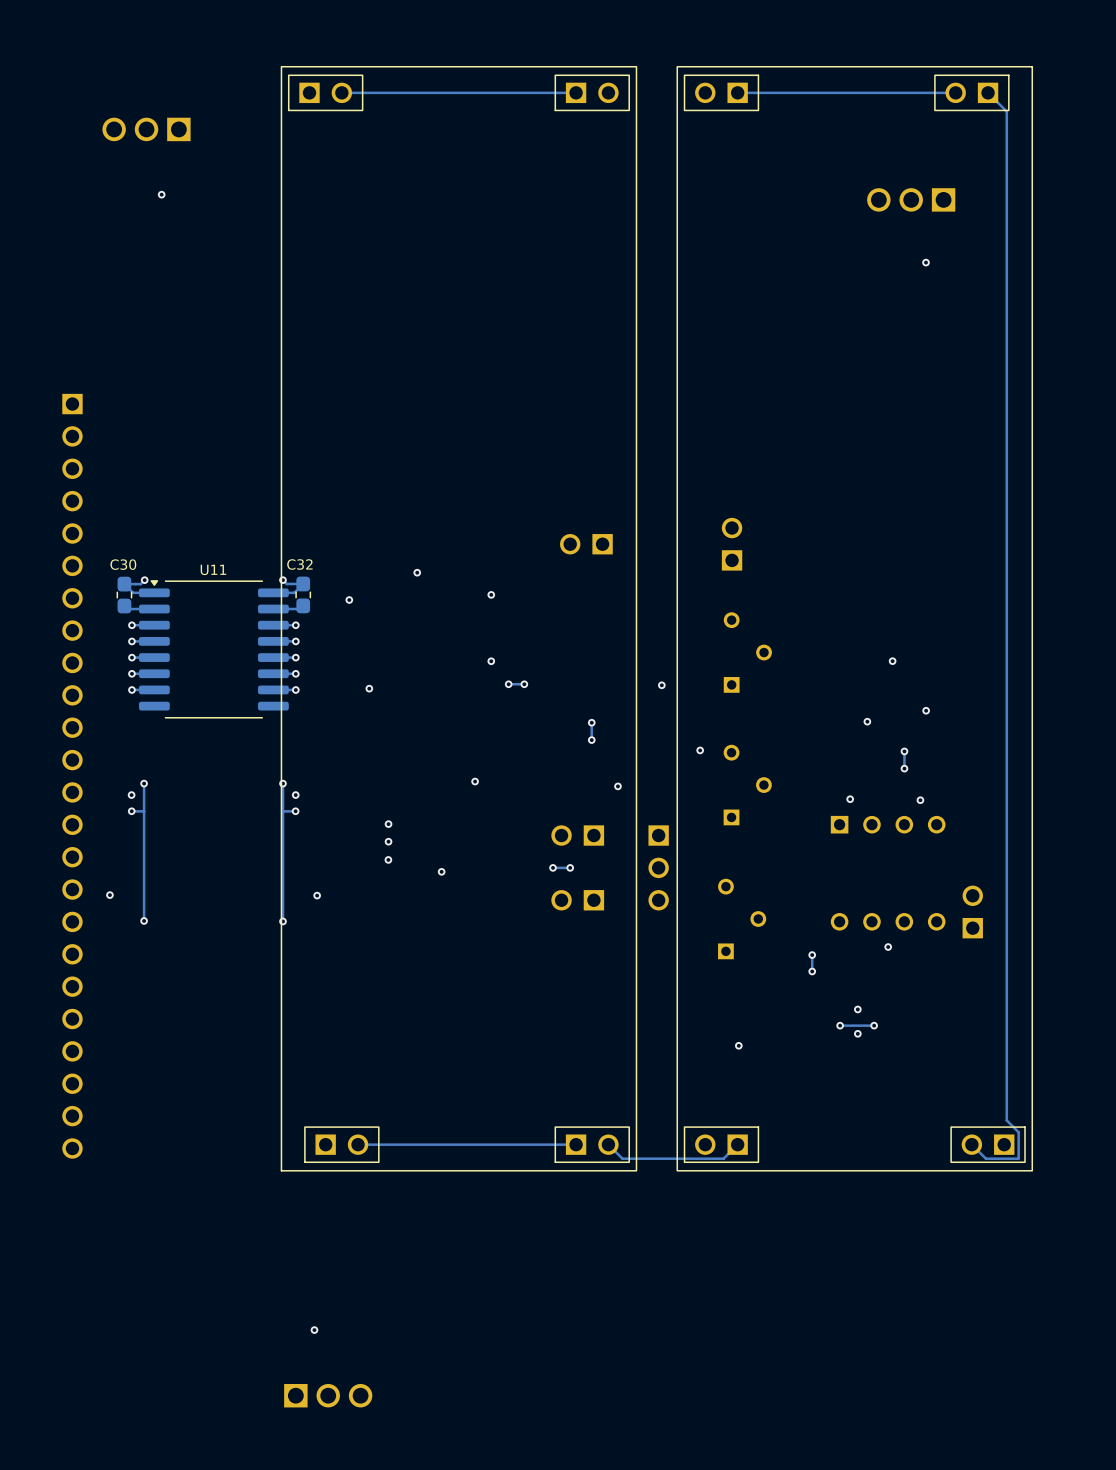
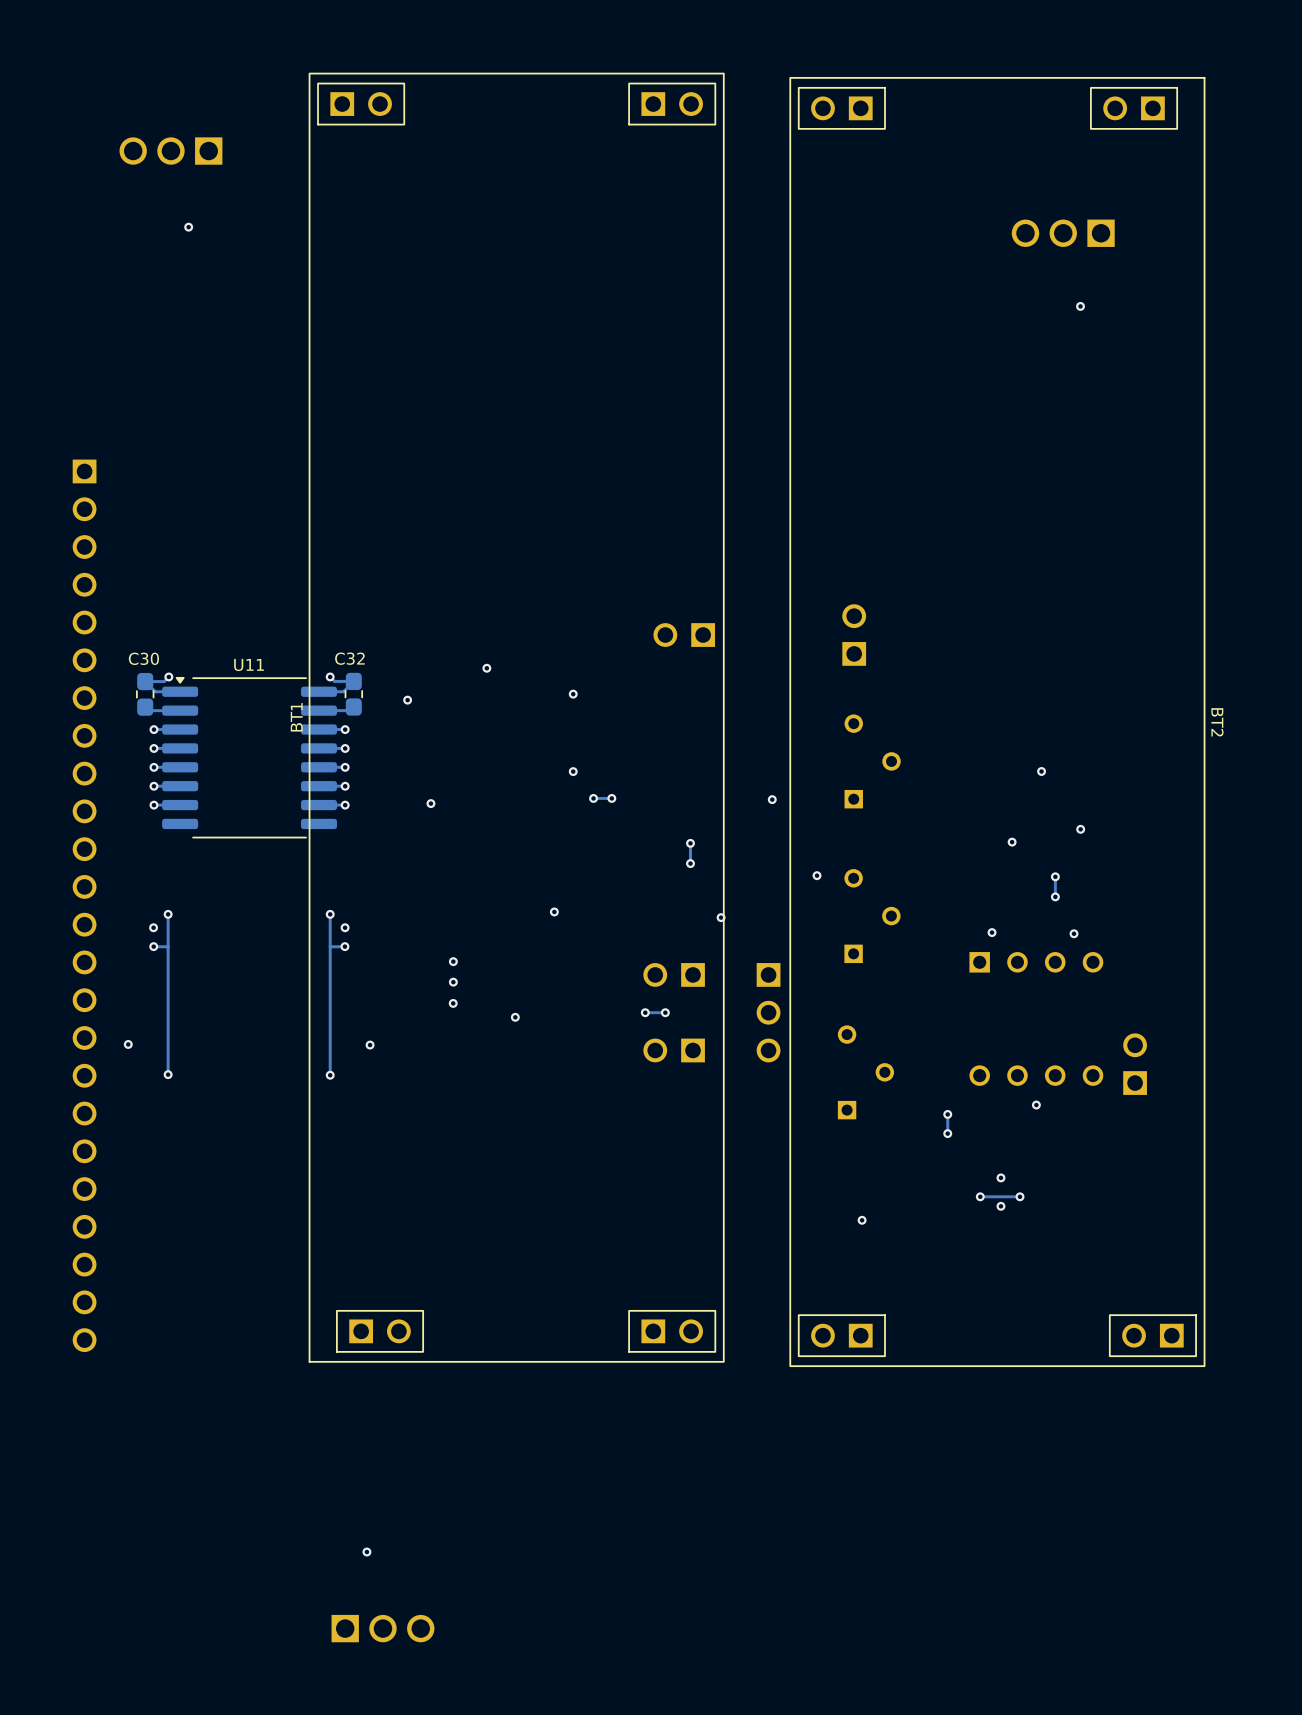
track: (576, 92) (341, 92) -> none
track: (955, 92) (737, 92) -> none
track: (988, 92) (1006, 111) (1006, 1120) (1018, 1132) (1018, 1158) (985, 1158) (971, 1144) -> none
BT1: none -> (516, 717)
part: (458, 618) -> none
BT2 name: none -> BT2 (1217, 722)
track: (576, 1144) (358, 1144) -> none
track: (737, 1144) (723, 1158) (622, 1158) (608, 1144) -> none

